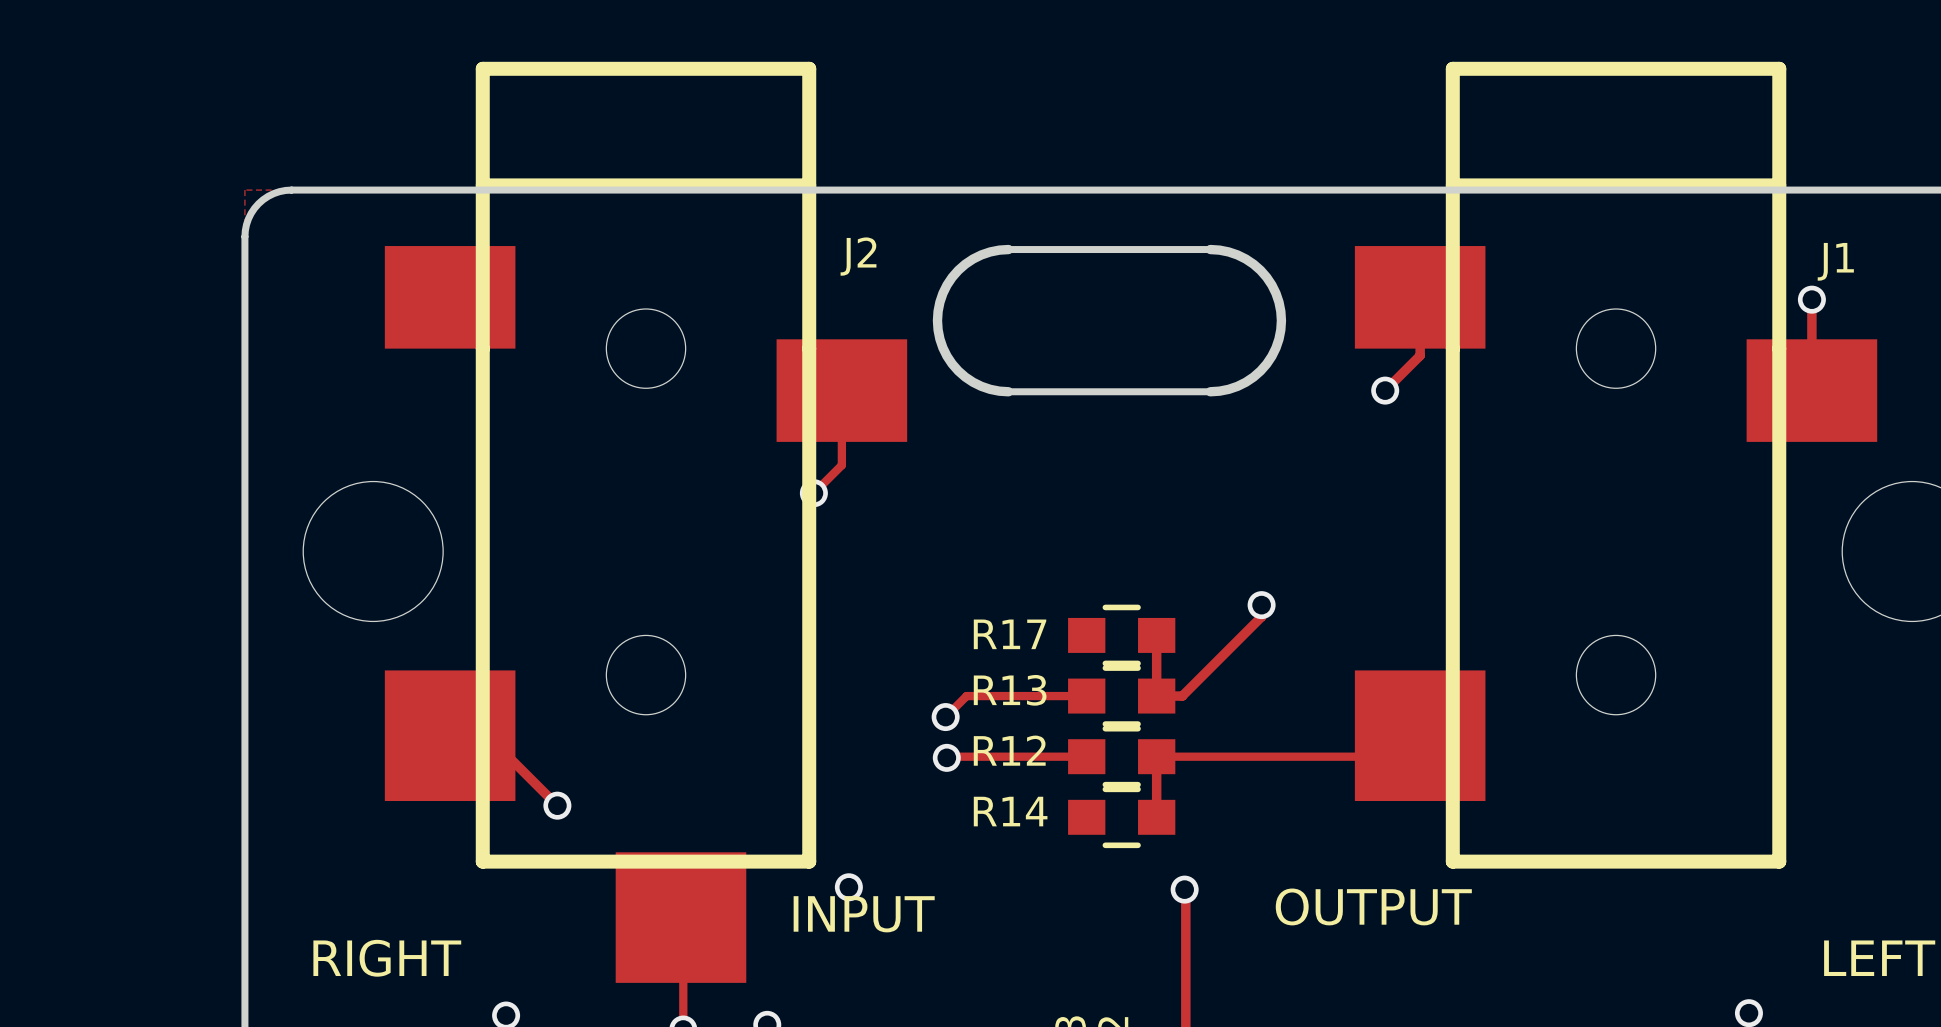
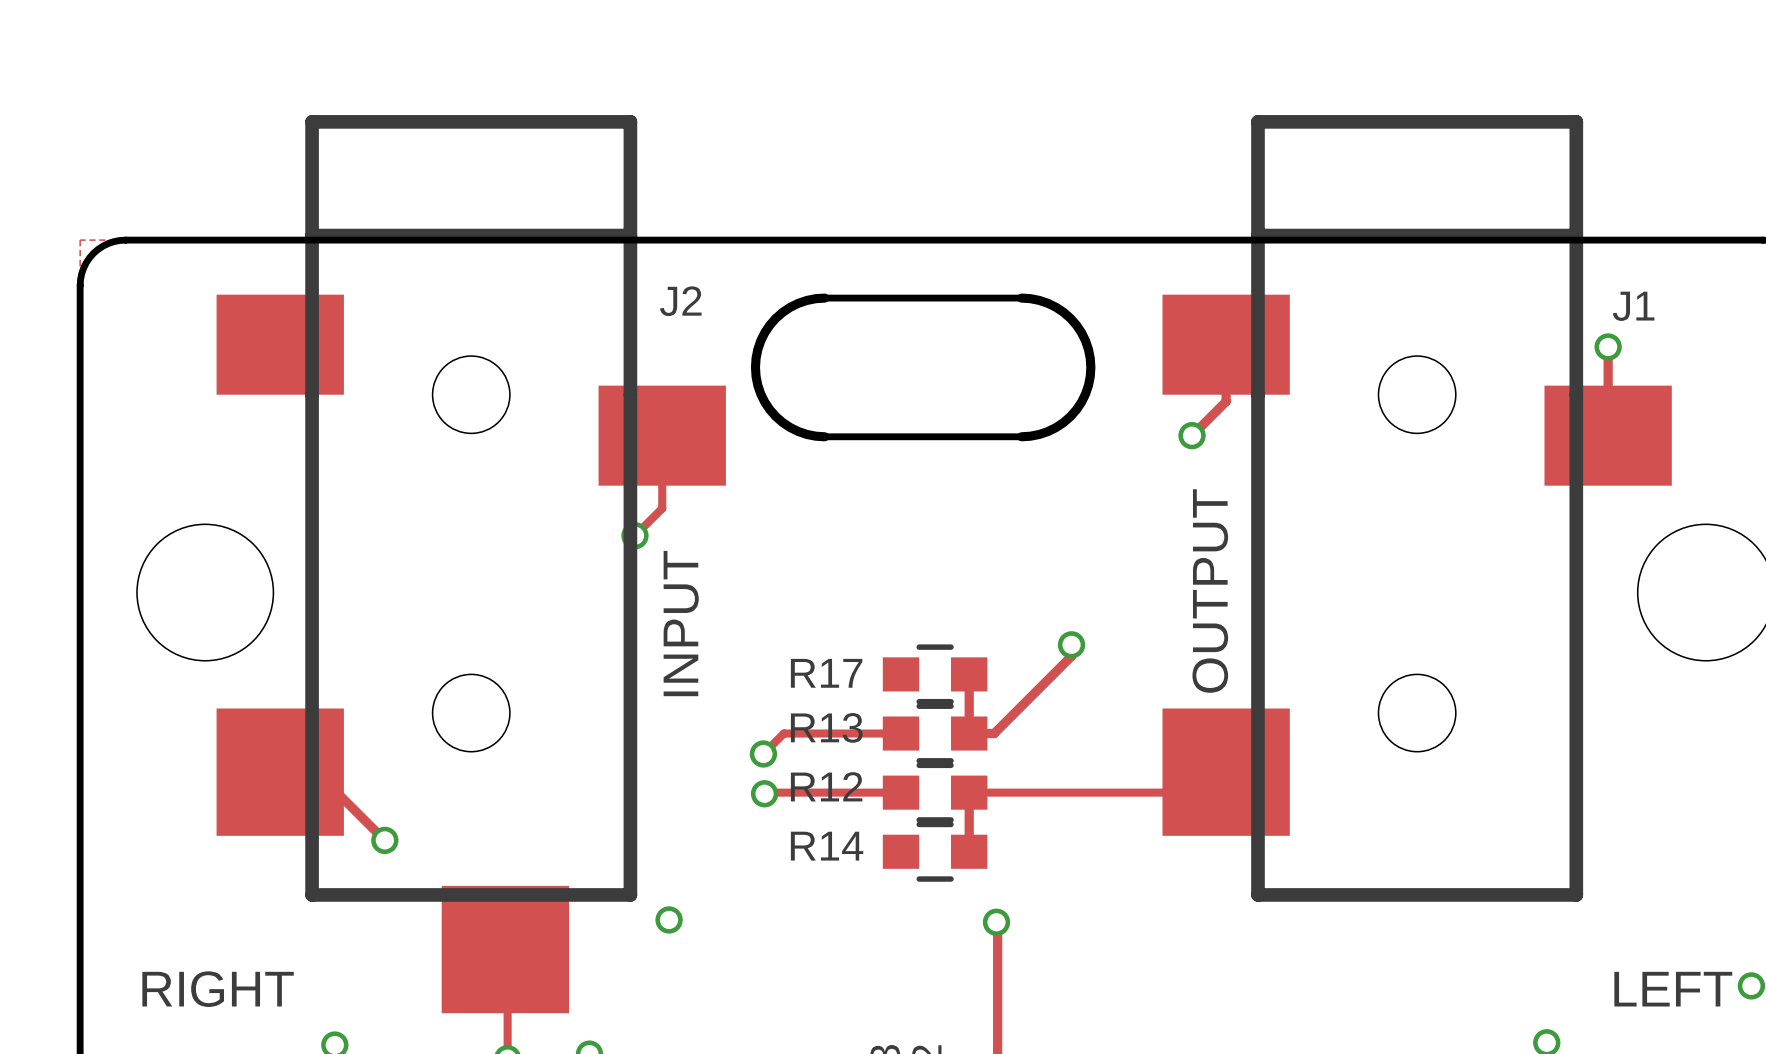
text rotation: 0° (1373, 906) -> 90° counterclockwise (1210, 591)
text position: OUTPUT (1373, 906) -> OUTPUT (1210, 591)
text rotation: 0° (864, 914) -> 90° counterclockwise (681, 623)
text position: INPUT (864, 914) -> INPUT (681, 623)

